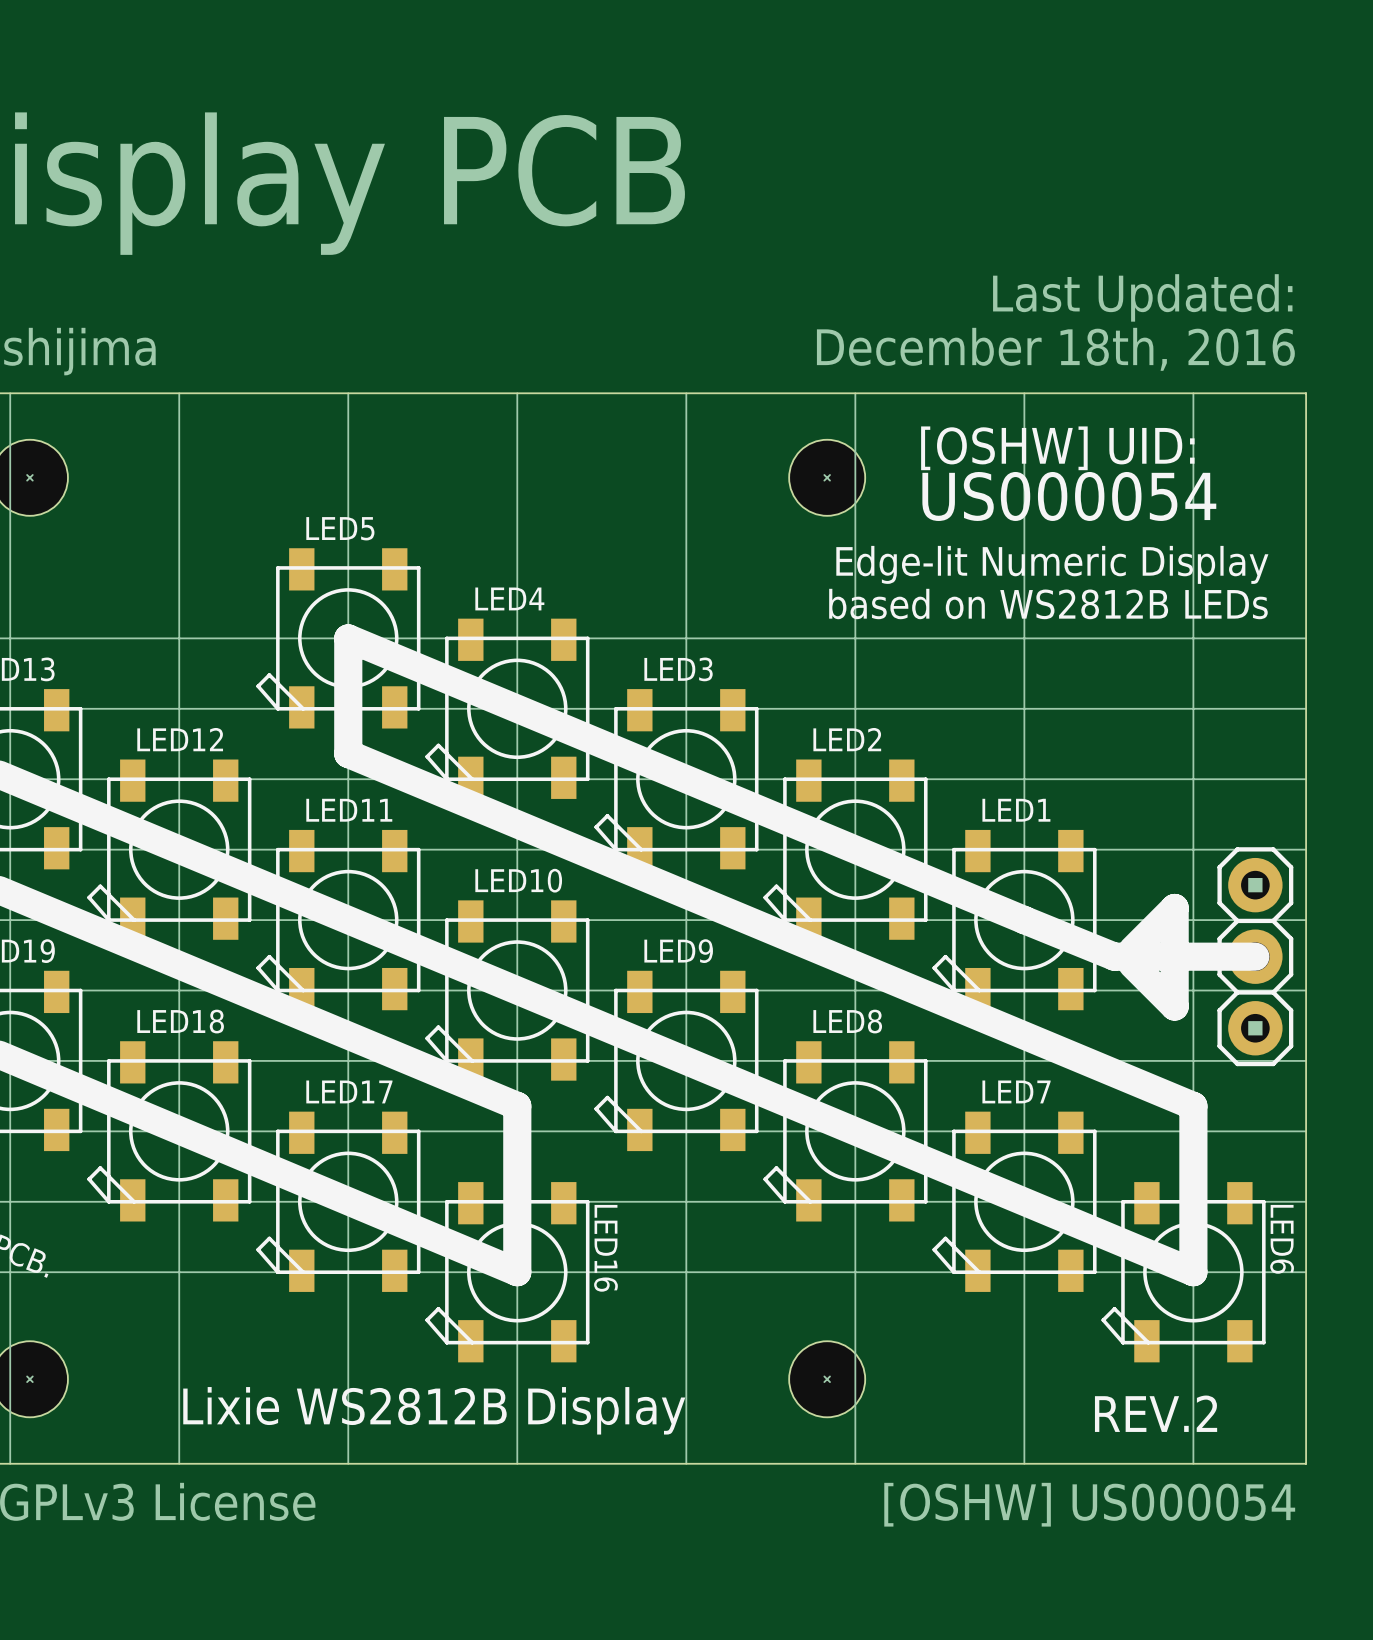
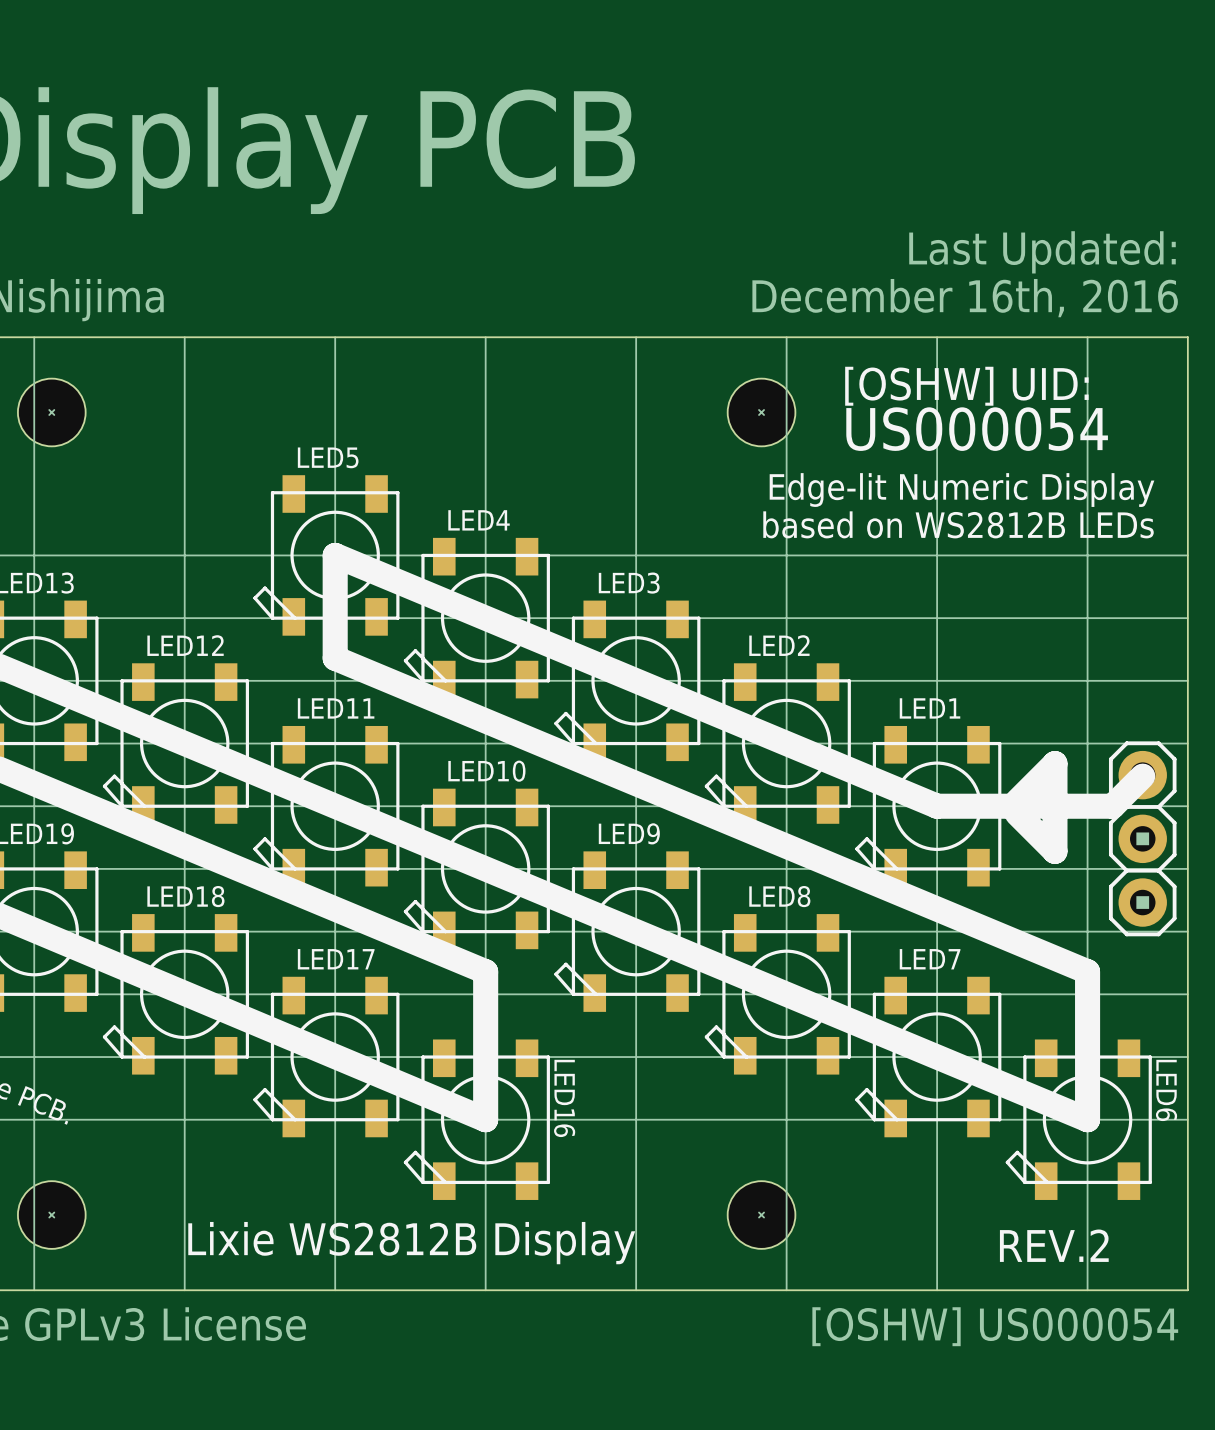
text: December 18th, 2016 (1055, 349) -> December 16th, 2016 (965, 298)
line: (1024, 920) (1114, 956) (1255, 956) -> (937, 806) (1112, 806) (1142, 776)
line: (1132, 950) (1174, 907) (1174, 1006) (1132, 964) -> (1017, 801) (1054, 763) (1054, 851) (1017, 813)

